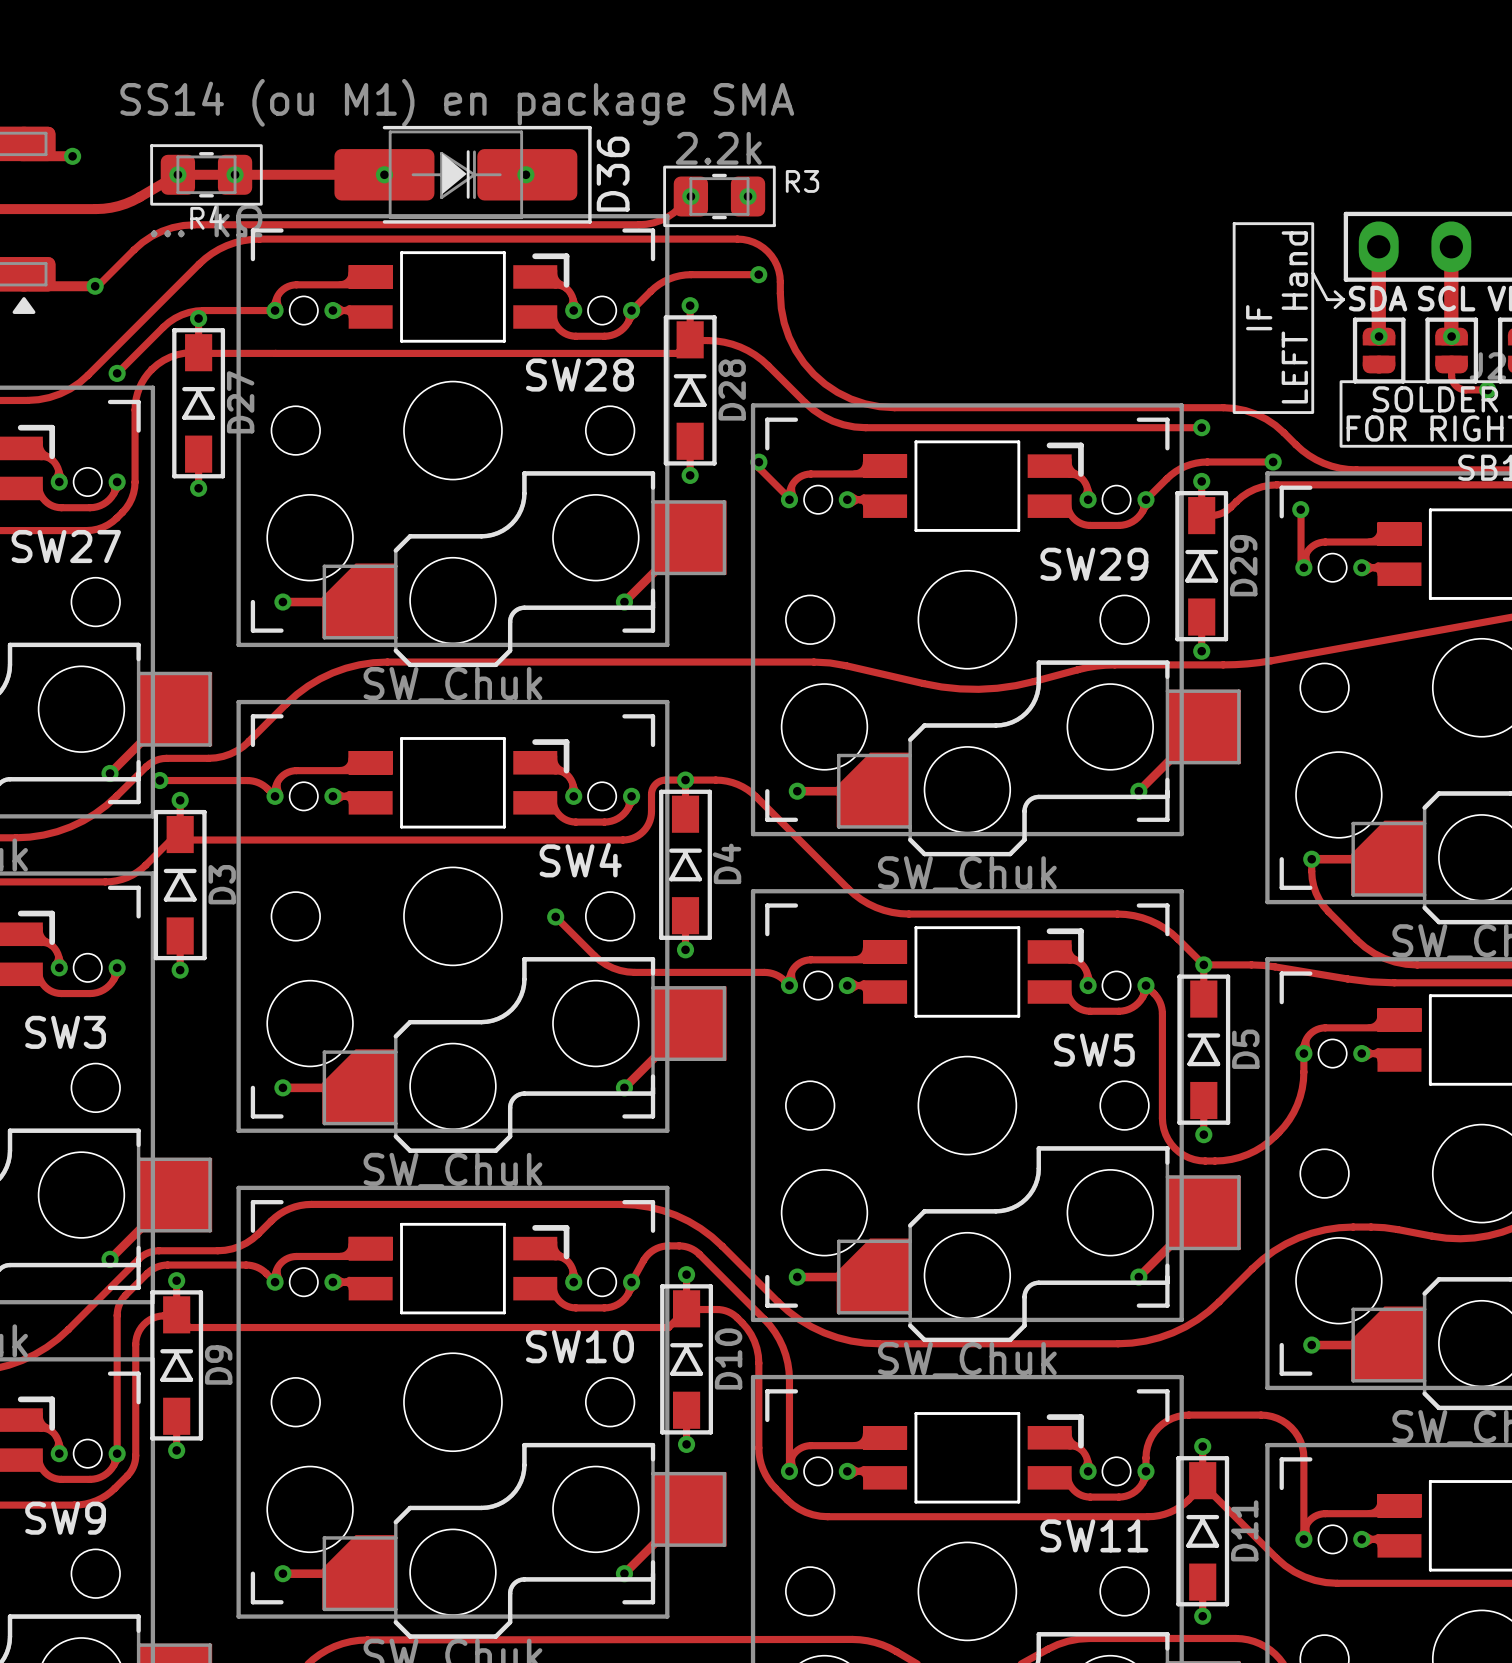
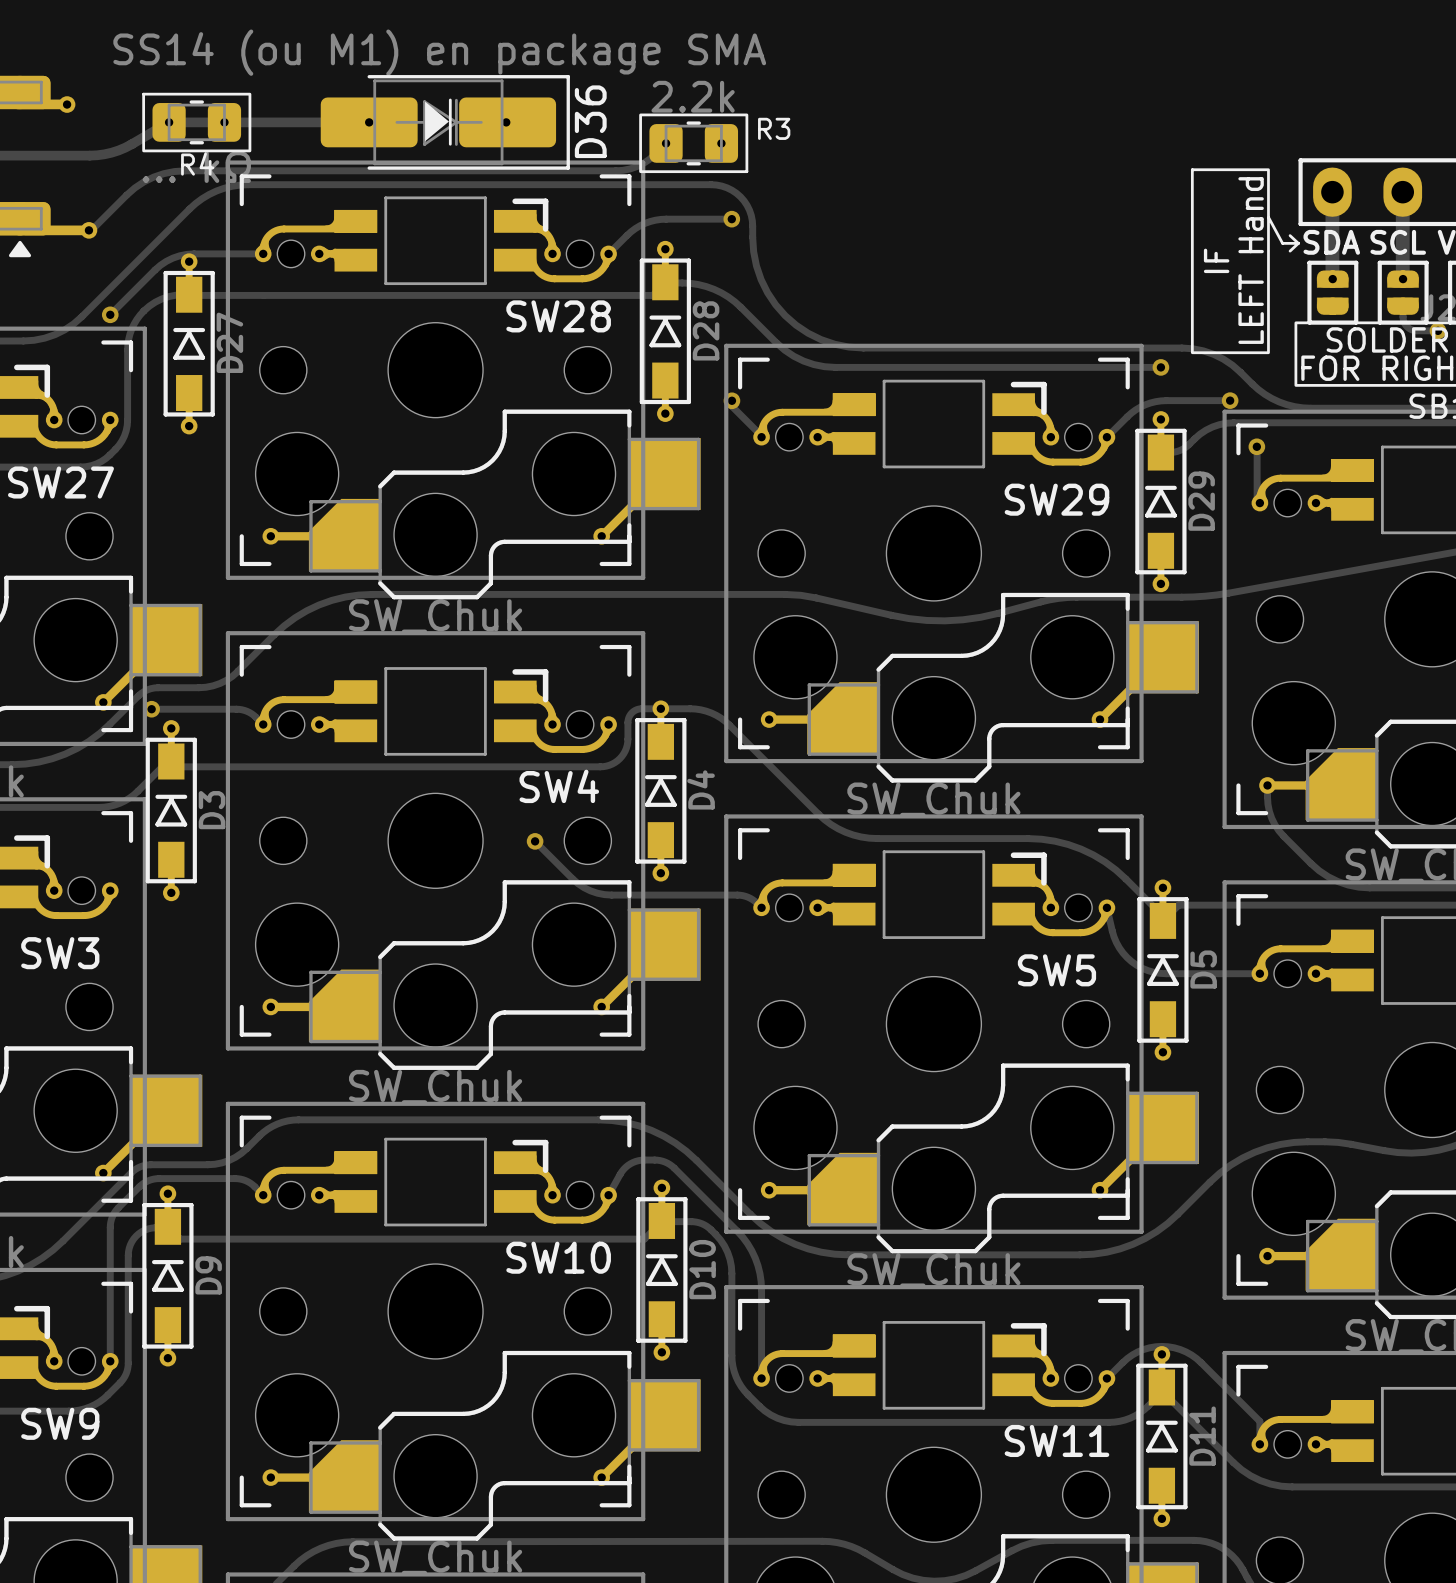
track: (1064, 914) (1125, 914) (1150, 920) (1171, 933) (1203, 964) (1263, 965) (1347, 978) (1394, 982) -> (1162, 920) (1178, 905) (1347, 905)
track: none -> (1028, 838) (1055, 841) (1093, 854) (1115, 869) (1162, 916)
track: (1145, 985) (1157, 997) (1162, 1011) (1163, 1129) (1174, 1148) (1188, 1157) (1205, 1161) (1231, 1159) (1255, 1150) (1269, 1141) (1284, 1126) (1297, 1104) (1303, 1080) (1303, 1053) -> (1106, 907) (1113, 936) (1119, 947) (1127, 957) (1142, 968) (1166, 973) (1259, 973)
track: (1145, 1471) (1146, 1452) (1151, 1436) (1162, 1423) (1172, 1418) (1188, 1415) (1272, 1416) (1291, 1427) (1302, 1446) (1303, 1515) -> (1106, 1378) (1127, 1358) (1137, 1351) (1155, 1346) (1174, 1347) (1196, 1358) (1259, 1421)

